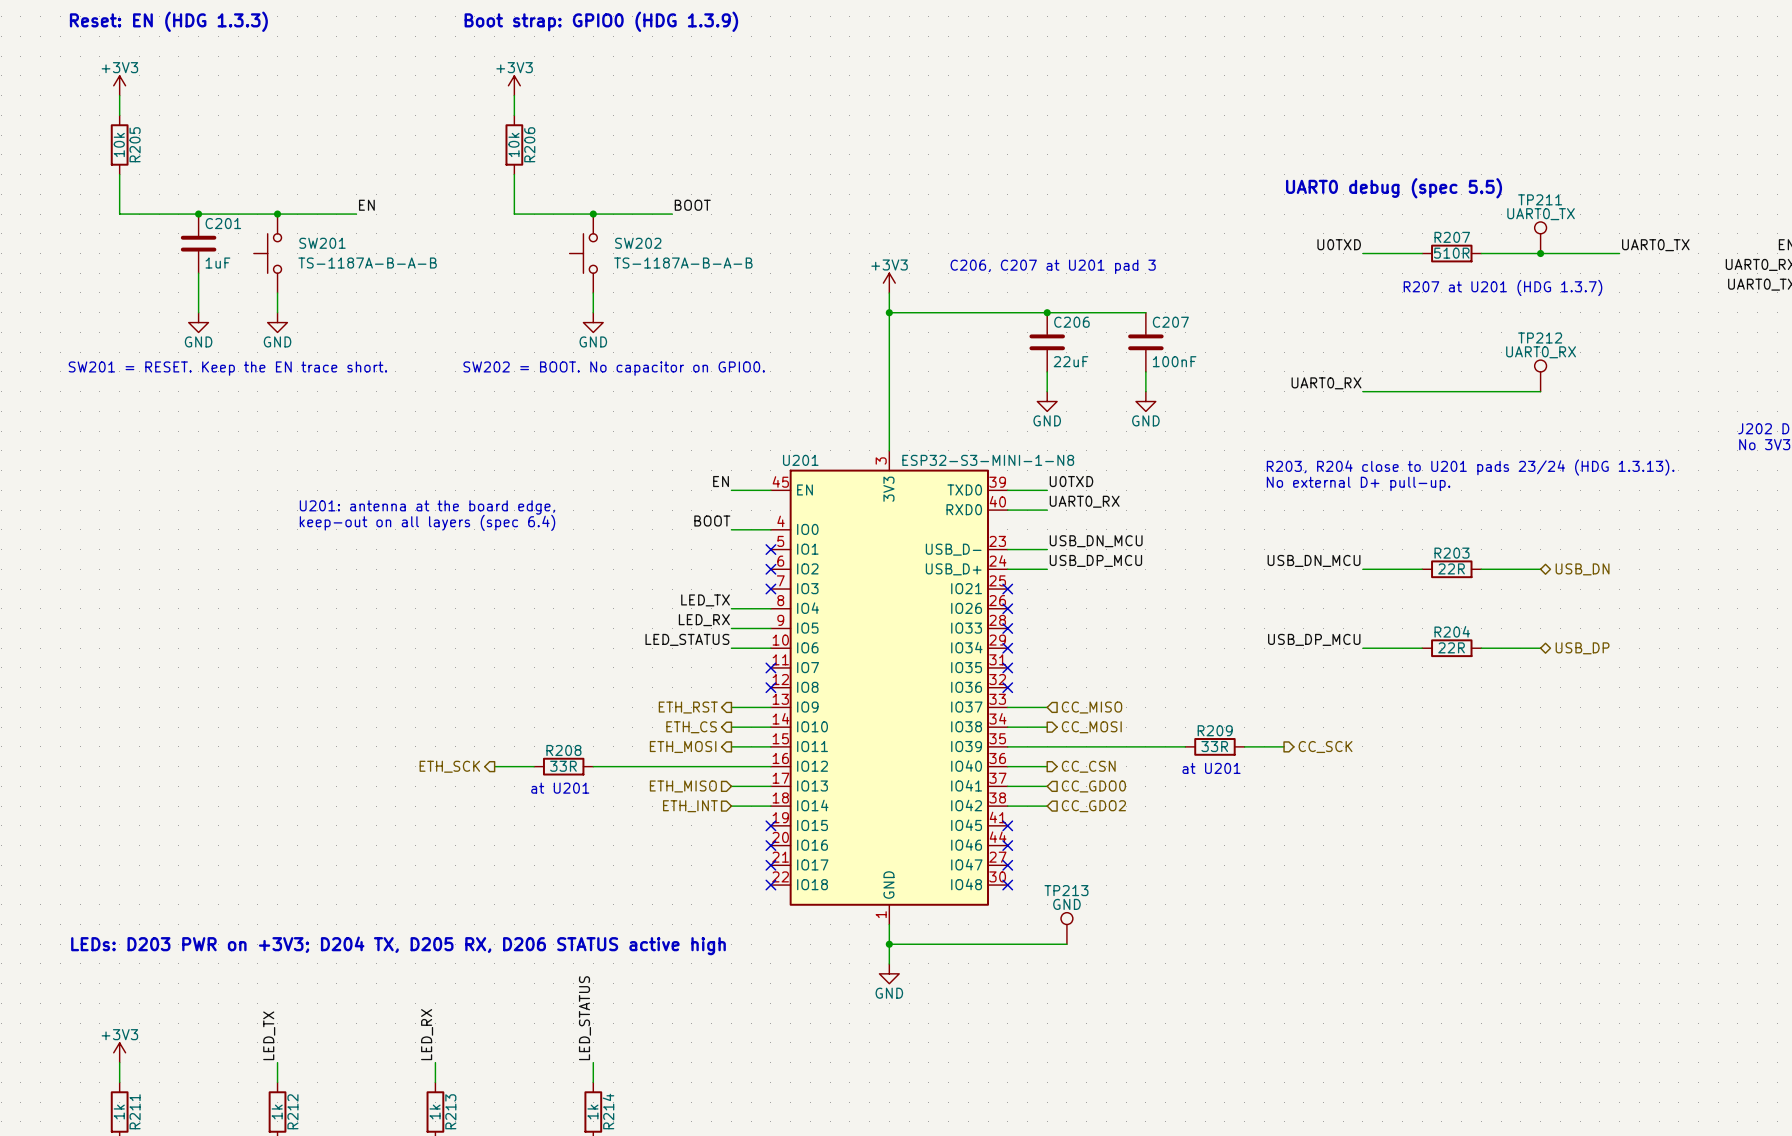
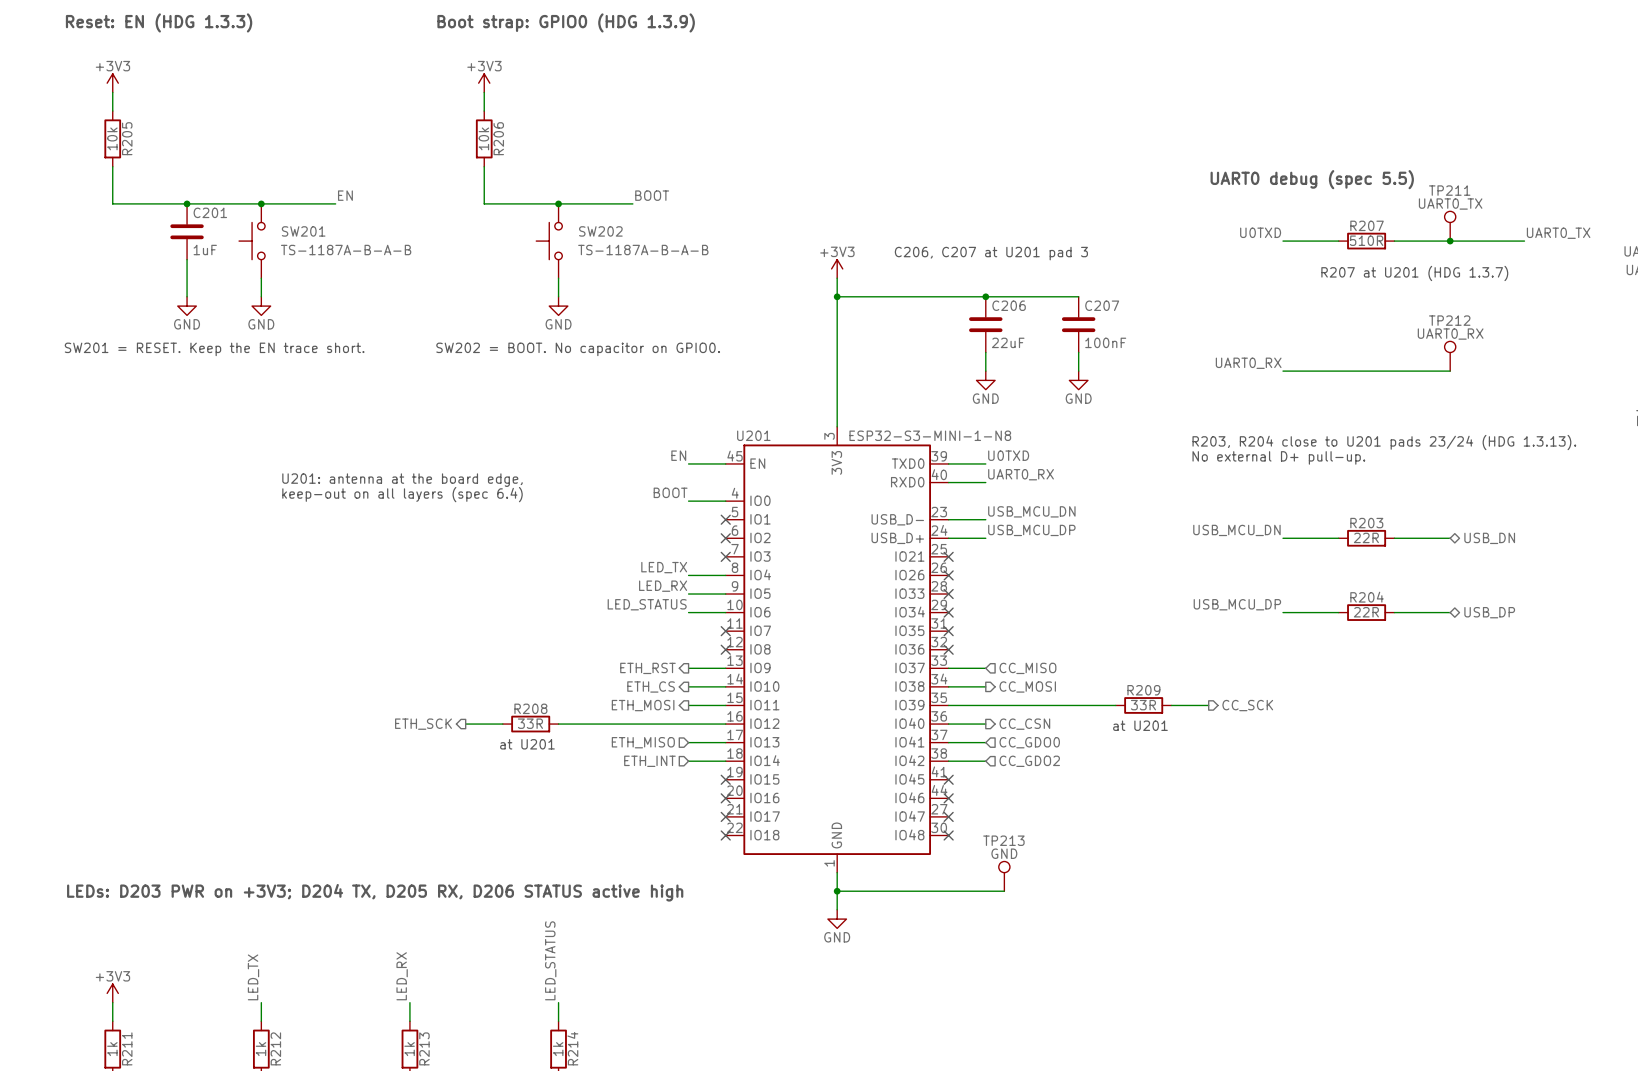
label: USB_DN_MCU (1096, 541) -> USB_MCU_DN (1031, 511)
label: USB_DP_MCU (1095, 560) -> USB_MCU_DP (1031, 530)
label: USB_DN_MCU (1314, 560) -> USB_MCU_DN (1236, 530)
label: USB_DP_MCU (1314, 639) -> USB_MCU_DP (1237, 604)

